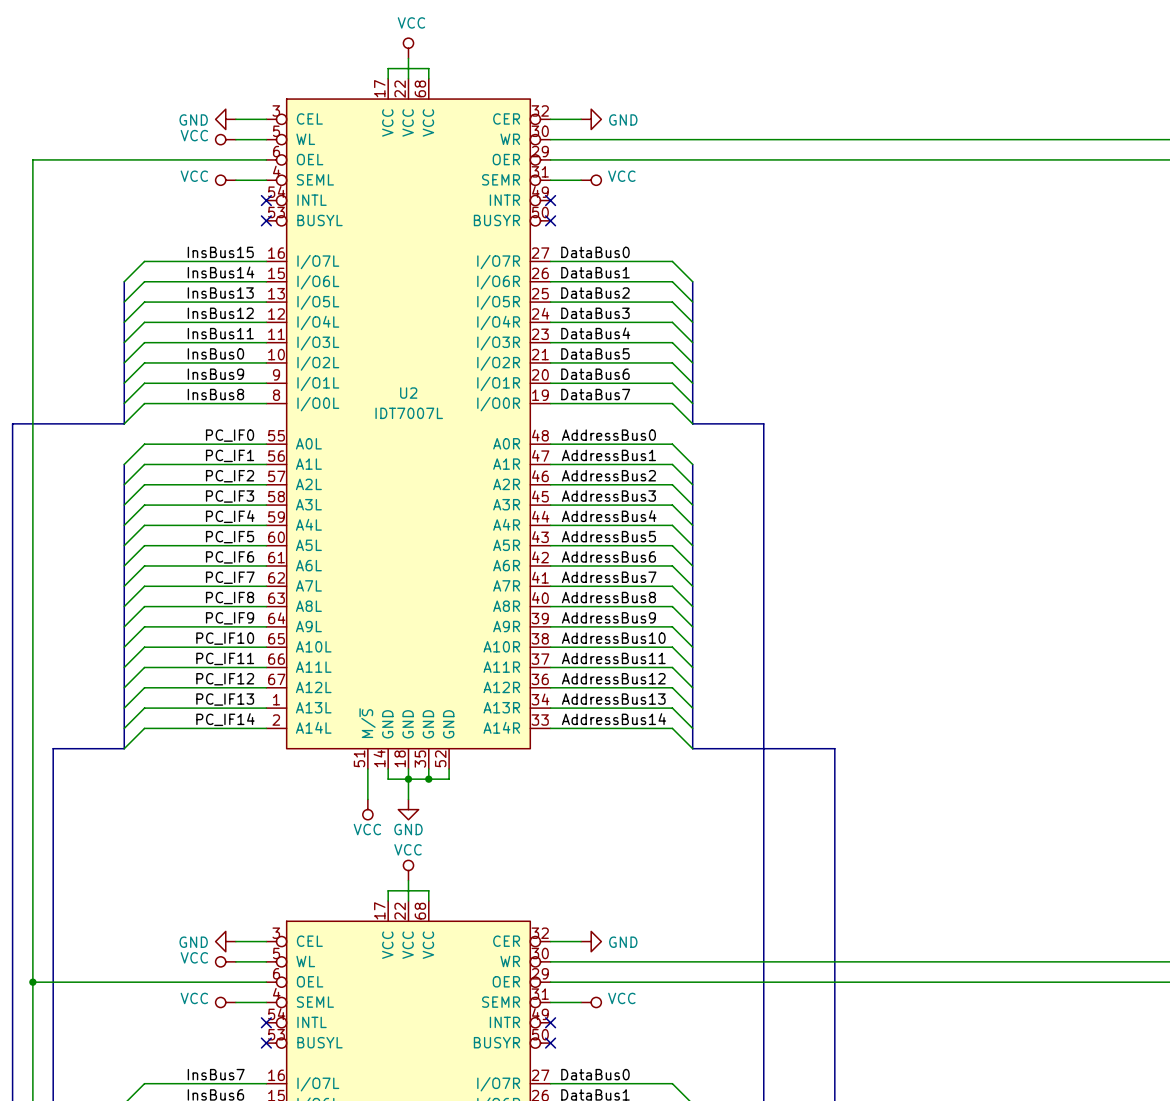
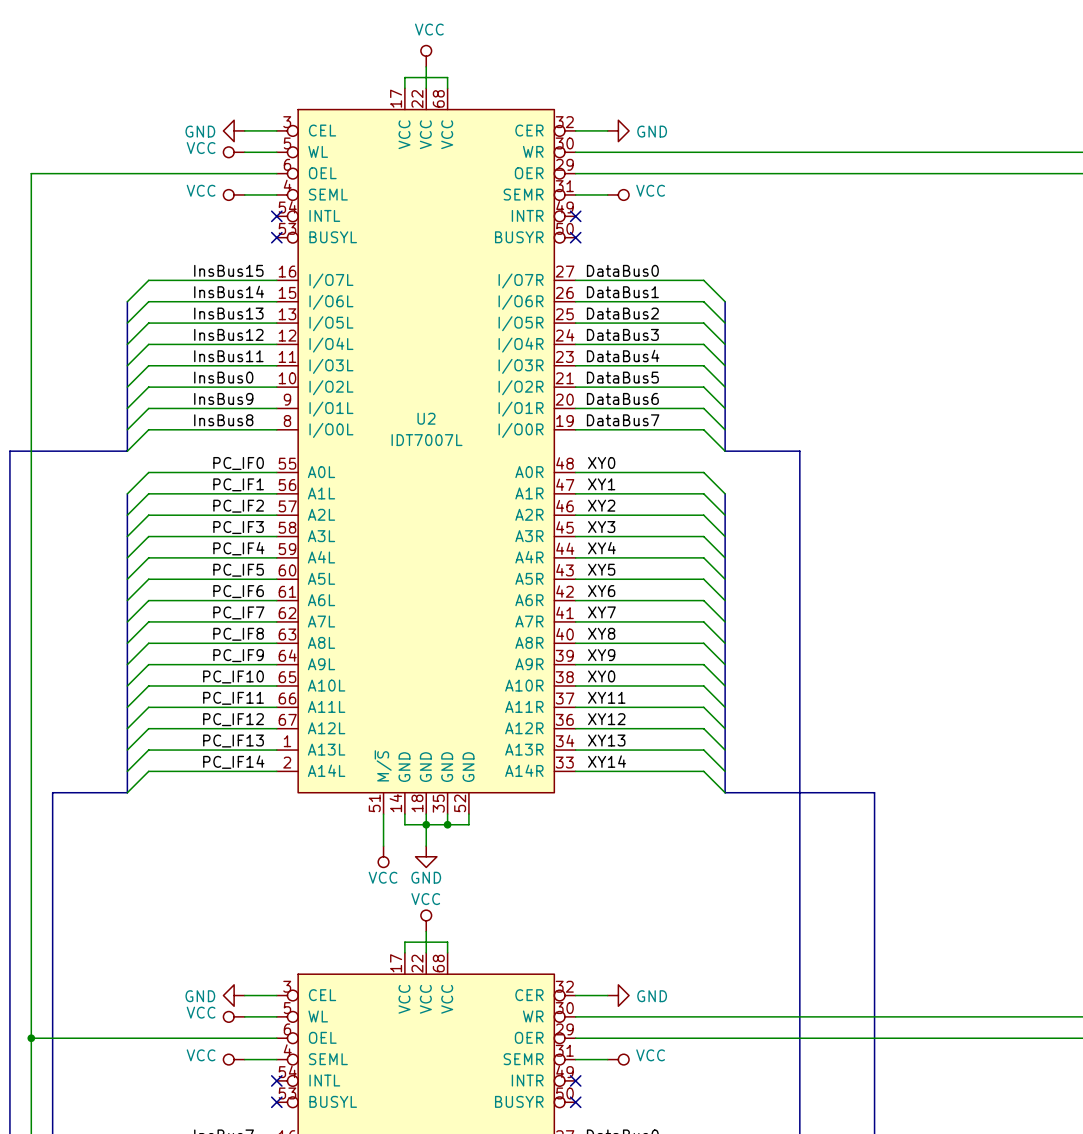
label: AddressBus0 (608, 435) -> XY0 (601, 462)
label: AddressBus1 (608, 455) -> XY1 (601, 484)
label: AddressBus2 (608, 475) -> XY2 (601, 505)
label: AddressBus3 (608, 496) -> XY3 (601, 527)
label: AddressBus4 (609, 516) -> XY4 (601, 548)
label: AddressBus5 (608, 536) -> XY5 (601, 569)
label: AddressBus6 (608, 556) -> XY6 (601, 591)
label: AddressBus7 (609, 577) -> XY7 (601, 612)
label: AddressBus8 (608, 597) -> XY8 (601, 633)
label: AddressBus9 (608, 617) -> XY9 (601, 655)
label: AddressBus10 (613, 638) -> XY0 (601, 676)
label: AddressBus11 (613, 658) -> XY11 (606, 697)
label: AddressBus12 (613, 678) -> XY12 (606, 719)
label: AddressBus13 (613, 699) -> XY13 (606, 740)
label: AddressBus14 (613, 719) -> XY14 (607, 761)

